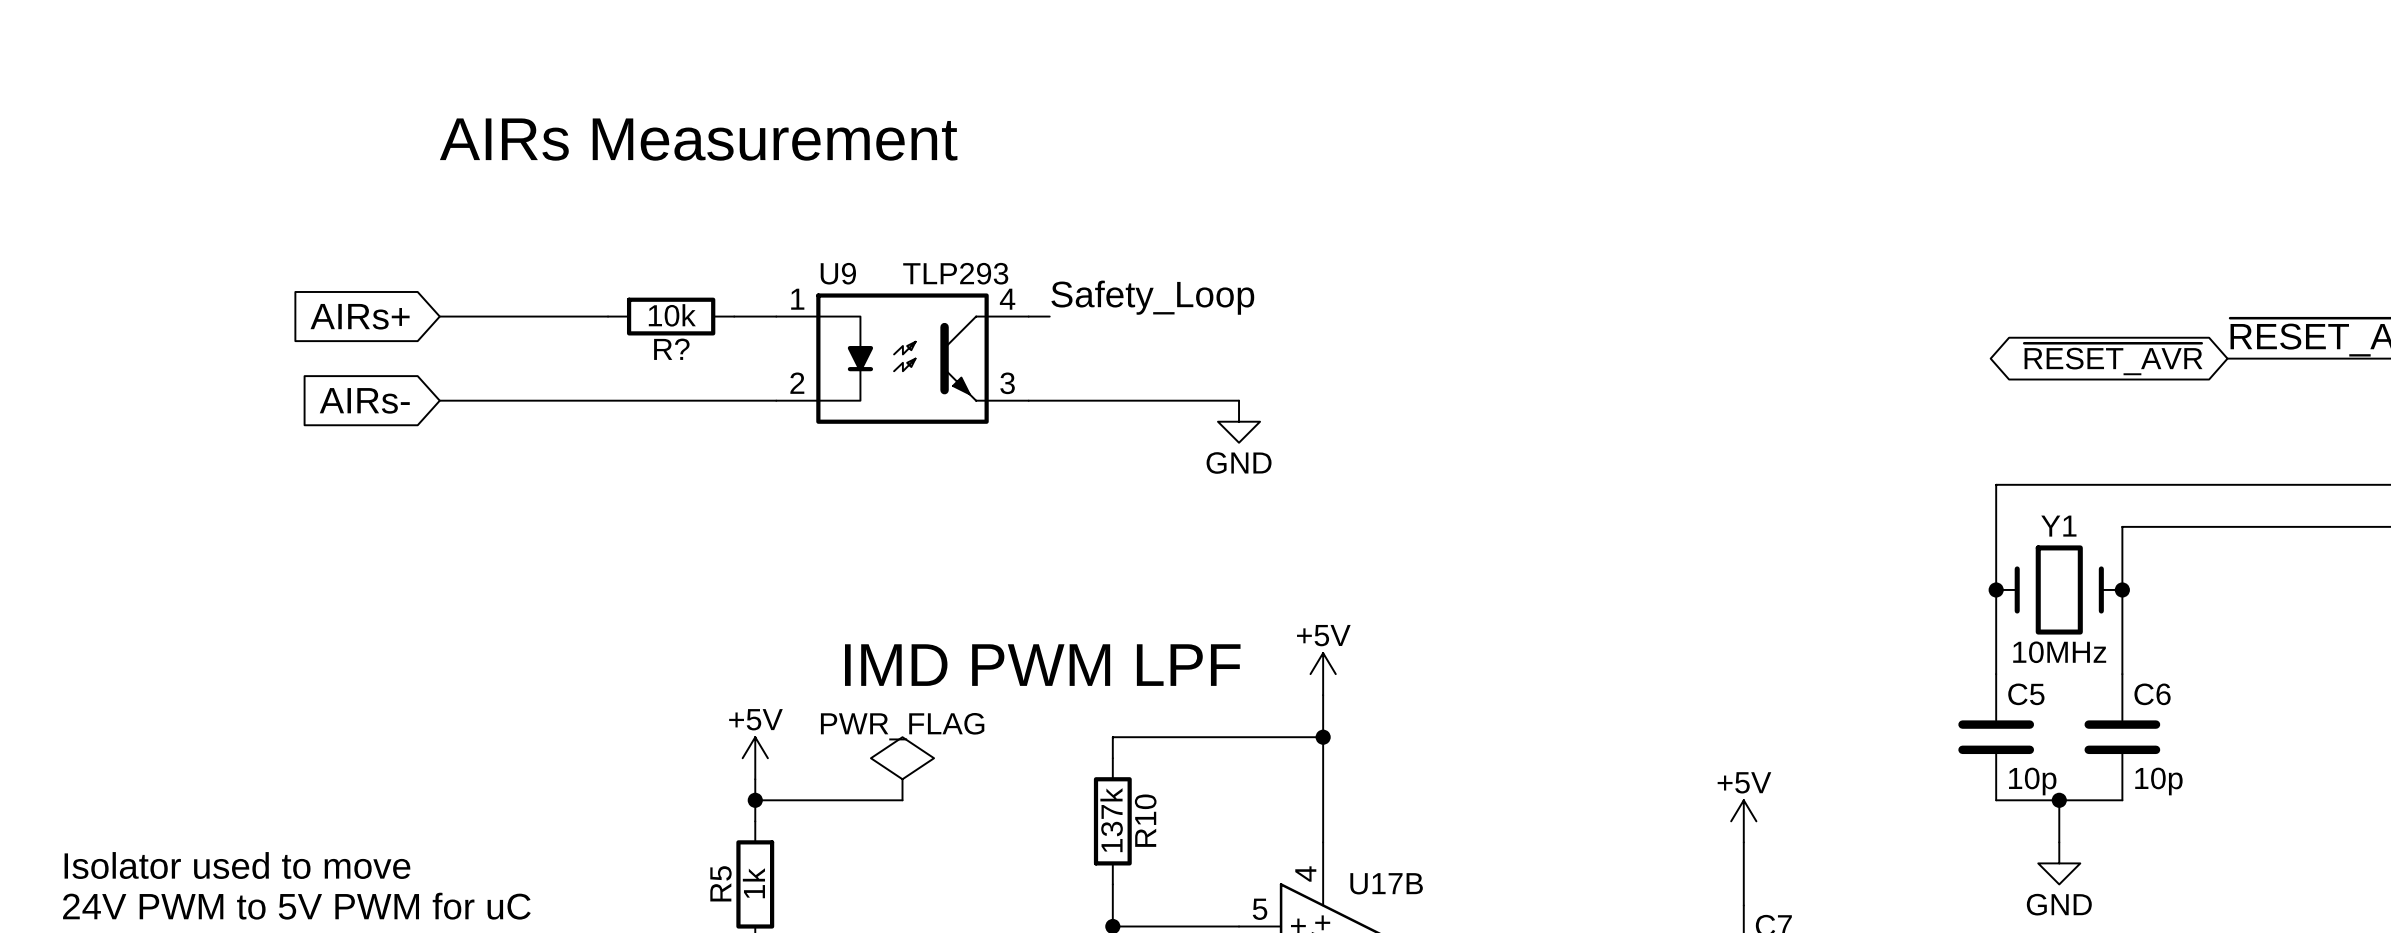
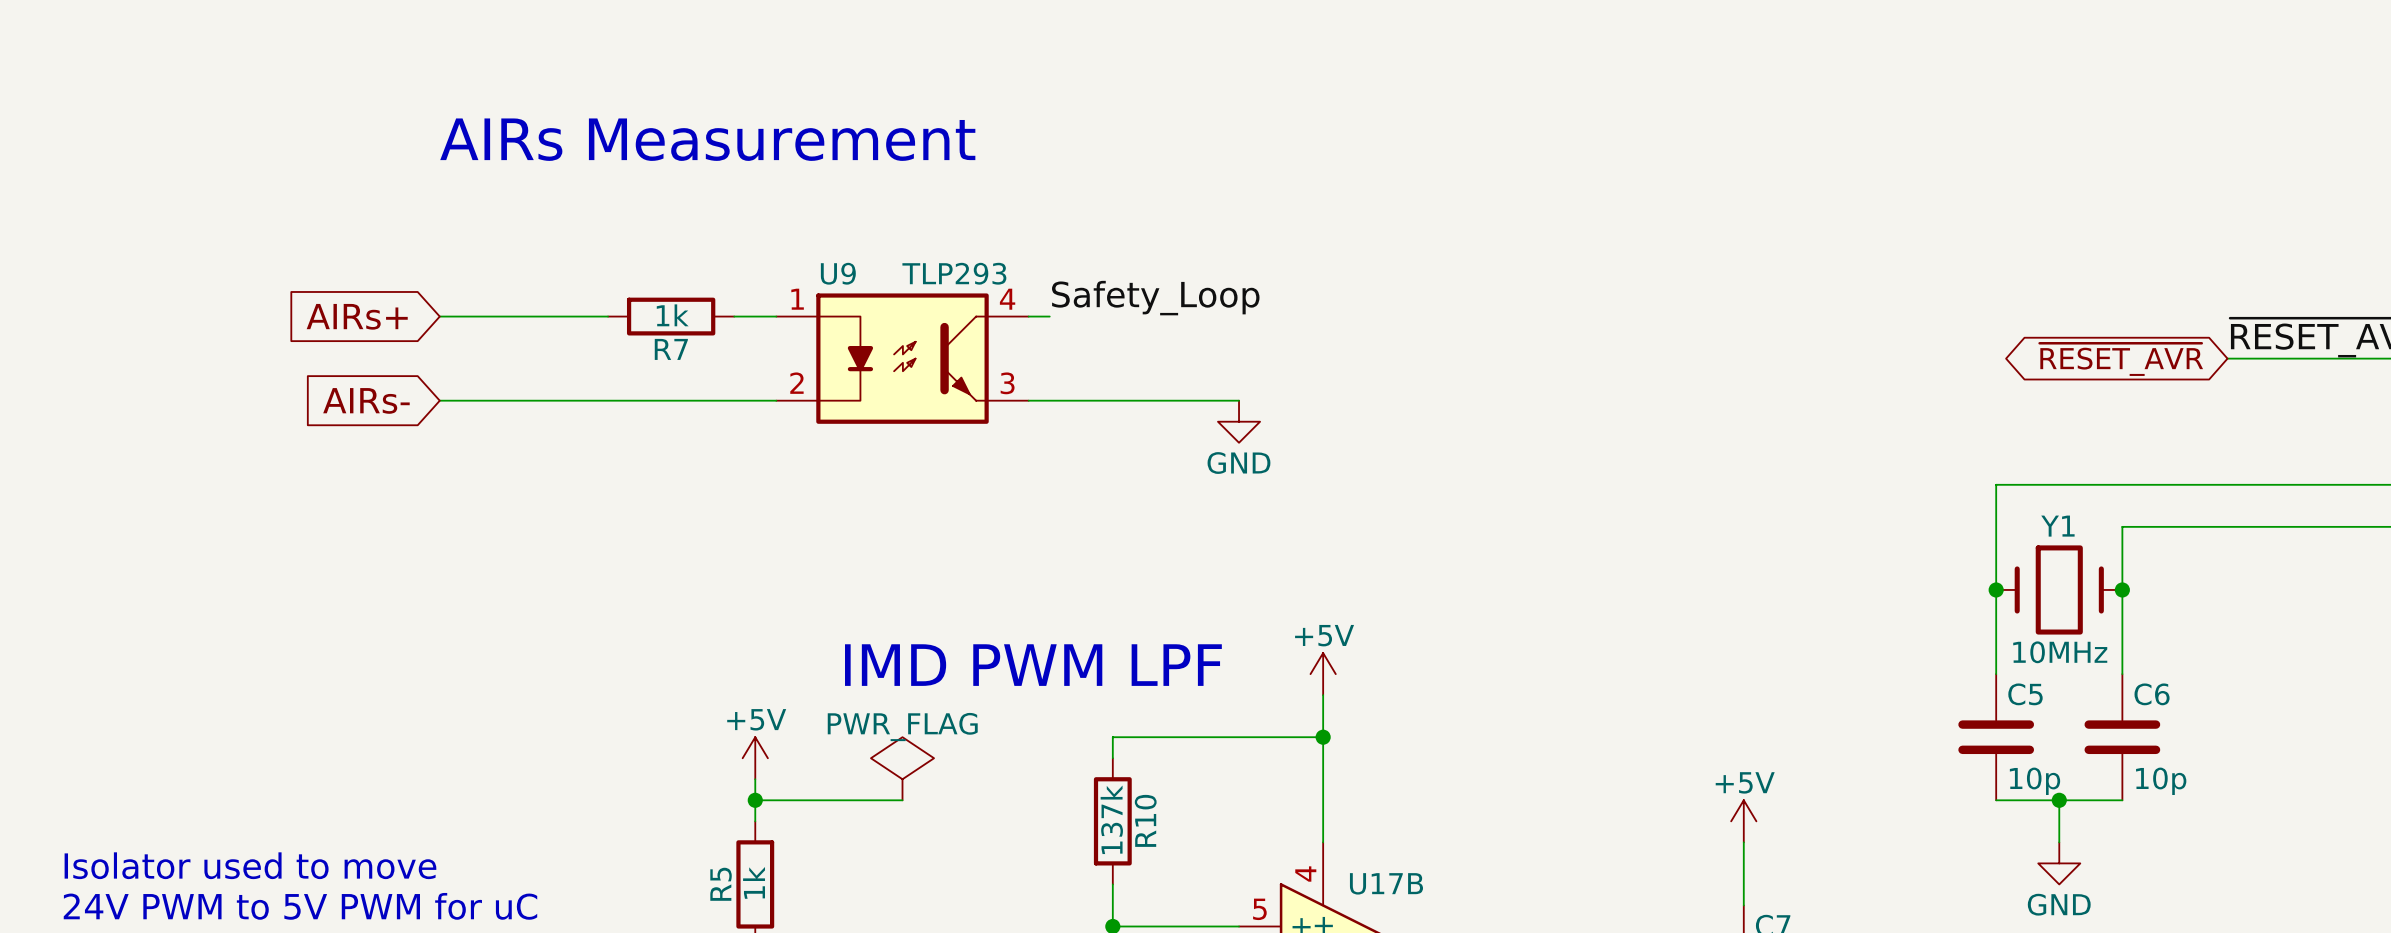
R? value: 10k (672, 315) -> 1k (672, 315)
R? name: R? (671, 349) -> R7 (671, 349)

